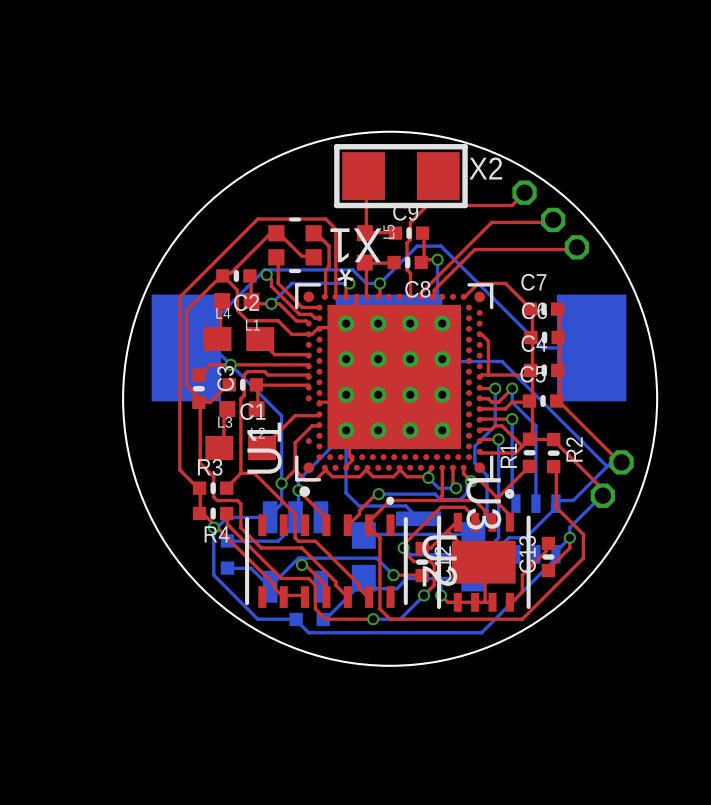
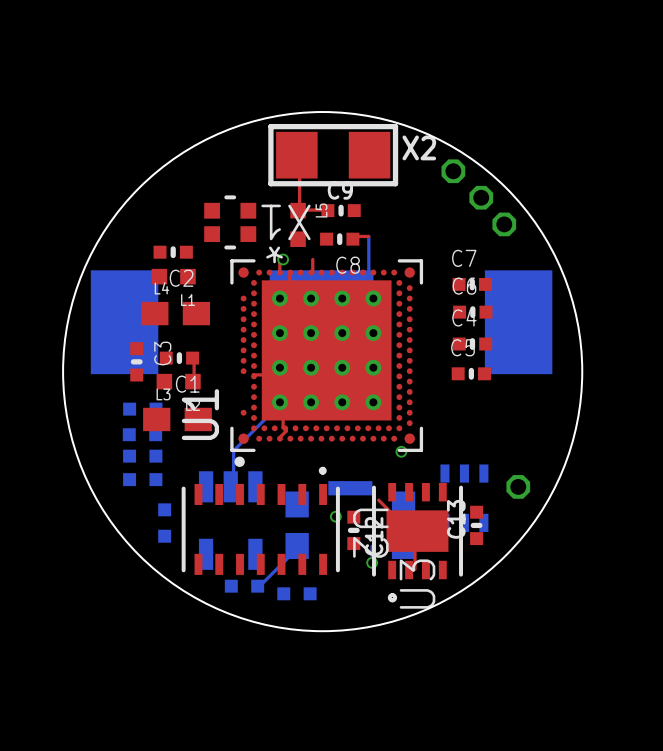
top track: (524, 192) (512, 205) (427, 205) (410, 222) (410, 239) (407, 242) (407, 269) (410, 273) (410, 297) -> none
top track: (553, 219) (552, 222) (491, 222) (420, 293) (420, 297) -> none
top track: (313, 233) (315, 232) (329, 246) (329, 266) (325, 269) (324, 296) -> none
top track: (422, 233) (424, 259) (421, 262) -> none
top track: (576, 247) (576, 249) (474, 249) (434, 290) (434, 297) (431, 296) -> none
top track: (276, 257) (278, 259) (278, 283) (302, 307) (318, 307) -> none
top track: (313, 257) (301, 256) (278, 232) (274, 235) (268, 235) (230, 273) (223, 273) (222, 275) -> none
via: (437, 259) -> none
top track: (394, 262) (366, 263) -> none
top track: (366, 263) (367, 296) -> none
top track: (266, 274) (271, 279) (271, 286) (299, 314) (310, 314) (314, 318) (319, 318) -> none
via: (266, 274) -> none
top track: (222, 275) (237, 290) (237, 310) (247, 320) (278, 320) (291, 334) (312, 334) (318, 327) (342, 327) (346, 324) -> none
top track: (222, 275) (186, 310) (186, 385) (196, 395) (196, 402) (198, 402) -> none
top track: (249, 275) (251, 300) (254, 303) (279, 303) (296, 321) (306, 321) (308, 323) -> none
bottom track: (349, 283) (291, 283) (271, 303) -> none
via: (379, 283) -> none
top track: (463, 296) (478, 283) (505, 283) (532, 310) (530, 337) (532, 337) (532, 368) (530, 370) -> none
top track: (335, 297) (335, 229) (325, 219) (257, 219) (179, 297) (179, 469) (199, 488) (200, 510) -> none
top track: (222, 301) (220, 337) (217, 339) -> none
via: (271, 303) -> none
top track: (557, 309) (559, 310) (558, 337) (559, 337) (559, 368) (557, 370) (559, 371) (559, 398) (556, 401) (621, 462) -> none
top track: (479, 334) (488, 341) (488, 375) -> none
top track: (260, 339) (274, 354) (308, 355) -> none
bottom track: (186, 347) (200, 334) (281, 415) (281, 503) (270, 517) (227, 517) (213, 531) (213, 575) (257, 619) (295, 619) (308, 632) (481, 632) (552, 561) (552, 554) (555, 554) (556, 551) (569, 537) (569, 527) (602, 495) -> none
bottom track: (186, 347) (264, 269) (352, 269) (366, 283) (379, 283) (417, 246) (440, 246) (542, 347) (591, 347) -> none
bottom track: (442, 359) (444, 361) (502, 361) (607, 466) -> none
via: (230, 364) -> none
top track: (308, 366) (210, 364) (198, 375) -> none
top track: (530, 370) (525, 375) (481, 375) (479, 376) -> none
top track: (530, 370) (532, 371) (532, 398) (529, 401) -> none
top track: (308, 376) (308, 375) (268, 375) (264, 371) (247, 371) (244, 375) (244, 395) (240, 398) (240, 473) -> none
top track: (229, 384) (210, 402) (198, 402) -> none
top track: (256, 384) (308, 385) (308, 387) -> none
top track: (479, 387) (495, 388) -> none
bottom track: (495, 388) (495, 425) (474, 446) (474, 463) (487, 475) (487, 522) (473, 535) (363, 535) -> none
via: (495, 388) -> none
top track: (512, 388) (498, 402) (479, 398) -> none
bottom track: (512, 388) (512, 402) (535, 425) (535, 503) -> none
via: (512, 388) -> none
top track: (529, 401) (512, 402) (505, 408) (479, 409) -> none
top track: (529, 401) (532, 402) (532, 436) (529, 439) (553, 439) (600, 486) (600, 493) (602, 495) -> none
top track: (198, 402) (200, 463) (213, 476) (213, 497) (217, 500) (237, 500) (240, 503) (240, 527) (261, 547) (301, 547) (335, 581) (335, 585) (347, 597) -> none
top track: (227, 409) (223, 412) (223, 442) (219, 448) -> none
top track: (319, 414) (295, 415) (262, 448) -> none
top track: (512, 419) (479, 419) -> none
bottom track: (512, 419) (512, 497) (515, 503) -> none
via: (512, 419) -> none
top track: (319, 425) (312, 425) (295, 442) (295, 469) -> none
bottom track: (346, 430) (346, 492) (359, 506) (405, 506) (418, 518) (417, 517) -> none
top track: (479, 430) (502, 425) (522, 446) -> none
top track: (498, 439) (479, 441) -> none
bottom track: (498, 439) (498, 537) (491, 544) (491, 551) (488, 554) (410, 554) (403, 547) -> none
via: (498, 439) -> none
top track: (529, 439) (515, 453) (479, 451) -> none
R1 side: top (529, 452) -> bottom (142, 409)
R2 side: top (553, 453) -> bottom (142, 434)
bottom track: (621, 462) (610, 463) (573, 500) (556, 500) (555, 503) (552, 503) (552, 510) (525, 537) (508, 537) (498, 547) (498, 554) (474, 578) (407, 578) (396, 588) (376, 588) (363, 578) -> none
part: (621, 462) -> none
top track: (529, 466) (495, 500) (508, 514) (509, 522) -> none
top track: (553, 466) (556, 469) (556, 507) (583, 534) (583, 558) (522, 619) (390, 619) (379, 609) (379, 537) (366, 524) (390, 500) (474, 500) (485, 510) (485, 514) (492, 522) -> none
top track: (442, 467) (443, 500) -> none
top track: (452, 467) (452, 485) (456, 488) -> none
top track: (463, 467) (463, 473) (471, 481) (480, 481) (497, 498) -> none
top track: (295, 469) (305, 480) (315, 480) (325, 469) -> none
top track: (295, 469) (281, 483) -> none
top track: (325, 469) (332, 476) (359, 476) (366, 469) -> none
top track: (366, 469) (373, 476) (393, 476) (400, 469) -> none
top track: (400, 469) (407, 476) (424, 476) (430, 469) -> none
top track: (240, 473) (226, 488) -> none
top track: (240, 473) (254, 473) (295, 514) (295, 537) (298, 541) (315, 541) (369, 597) -> none
bottom track: (428, 477) (438, 488) (456, 488) -> none
via: (428, 477) -> none
bottom track: (471, 481) (467, 485) (467, 492) (460, 499) (440, 499) (435, 494) (378, 494) -> none
via: (281, 483) -> none
R3 side: top (213, 488) -> bottom (142, 456)
via: (456, 488) -> none
top track: (298, 490) (325, 517) (326, 525) -> none
via: (298, 490) -> none
top track: (378, 494) (376, 494) (359, 510) (359, 514) (347, 525) -> none
via: (378, 494) -> none
part position: (602, 495) -> (518, 486)
top track: (200, 510) (274, 585) (274, 588) (281, 595) (305, 597) -> none
R4 side: top (213, 513) -> bottom (142, 479)
top track: (226, 513) (227, 524) (281, 578) (308, 578) (315, 585) (315, 609) (325, 619) (373, 619) -> none
bottom track: (295, 517) (295, 524) (278, 541) (227, 540) -> none
top track: (457, 522) (430, 547) (422, 548) -> none
top track: (475, 522) (478, 520) (464, 507) (440, 507) (403, 544) (403, 551) (413, 561) (430, 561) (434, 564) (434, 585) (424, 595) -> none
via: (213, 527) -> none
top track: (569, 537) (569, 547) (548, 570) -> none
via: (569, 537) -> none
top track: (548, 543) (546, 544) (546, 551) (522, 575) (522, 592) (509, 602) -> none
U3 rotation: 0° (483, 550) -> 180° (417, 542)
top track: (301, 564) (305, 564) (325, 585) (326, 597) -> none
via: (301, 564) -> none
bottom track: (227, 568) (251, 568) (270, 586) (298, 558) (376, 558) (393, 575) -> none
top track: (393, 575) (422, 575) -> none
via: (393, 575) -> none
bottom track: (424, 595) (400, 619) (373, 619) -> none
via: (424, 595) -> none
top track: (440, 595) (447, 602) (474, 602) -> none
top track: (475, 602) (492, 602) -> none
via: (373, 619) -> none
part: none -> (296, 593)

